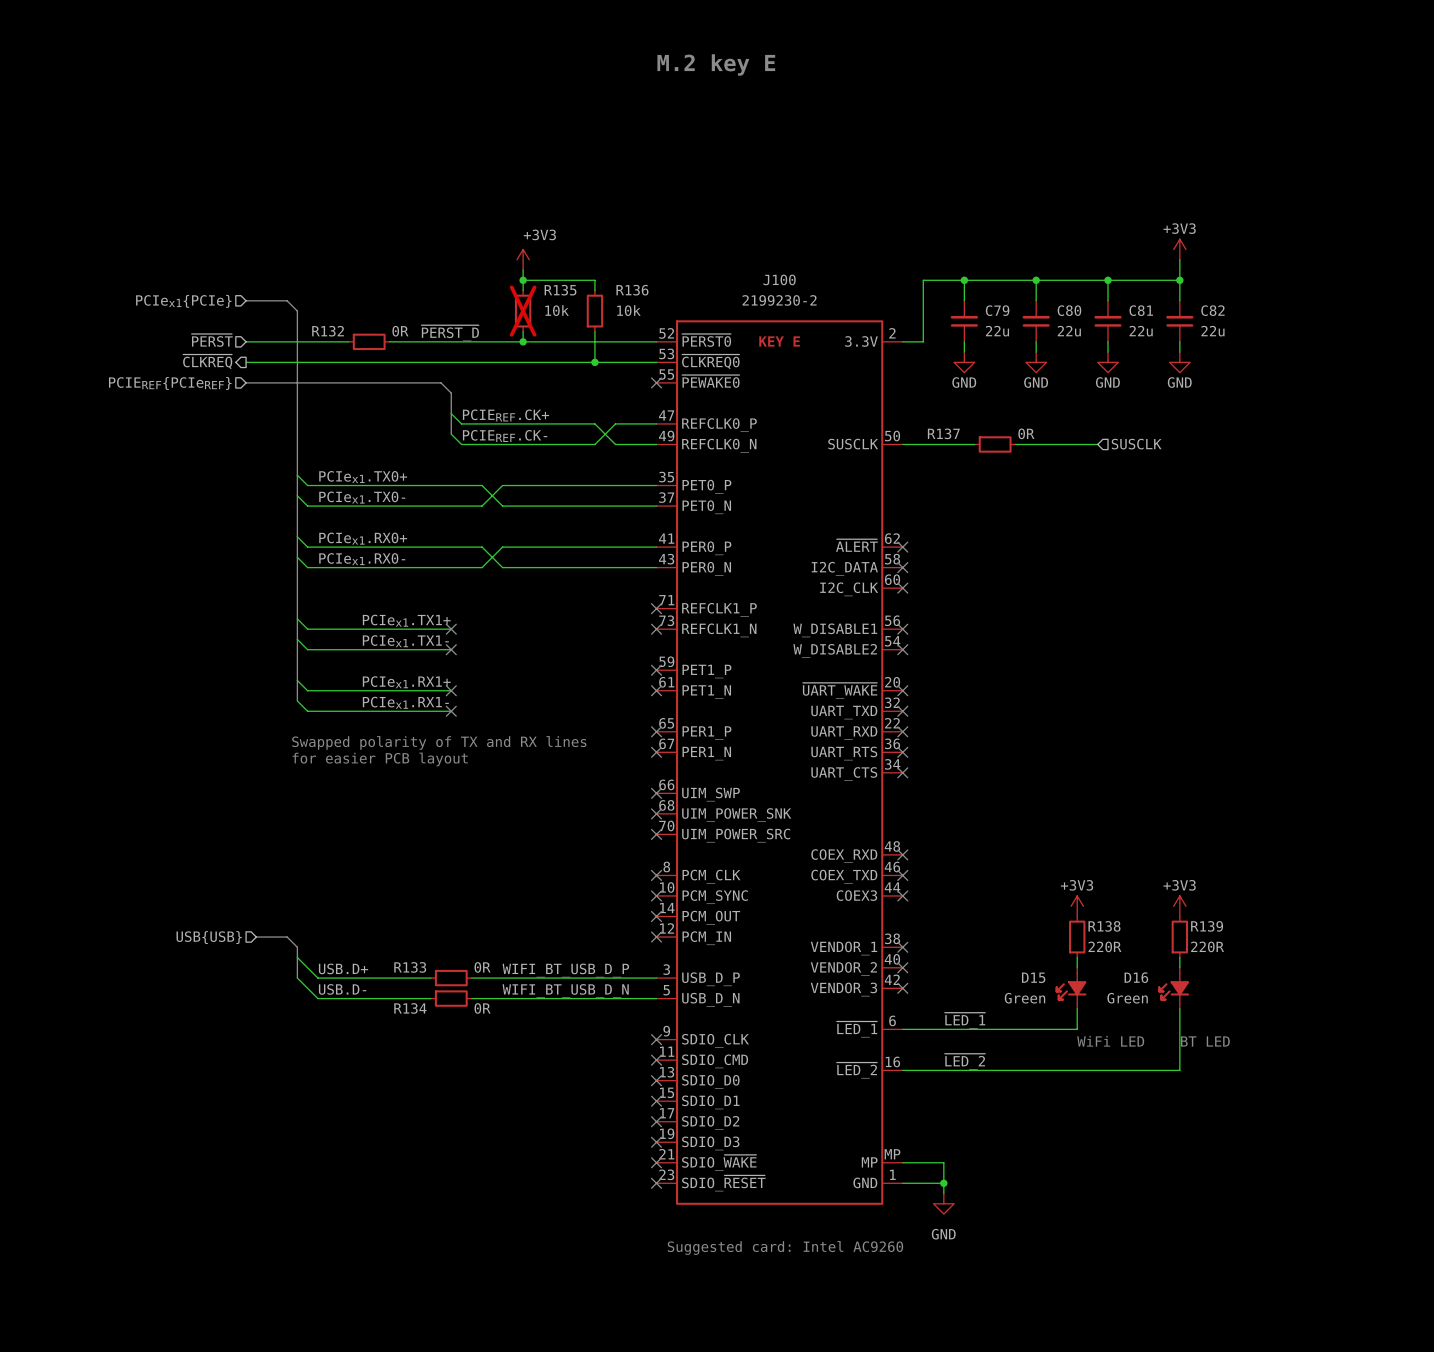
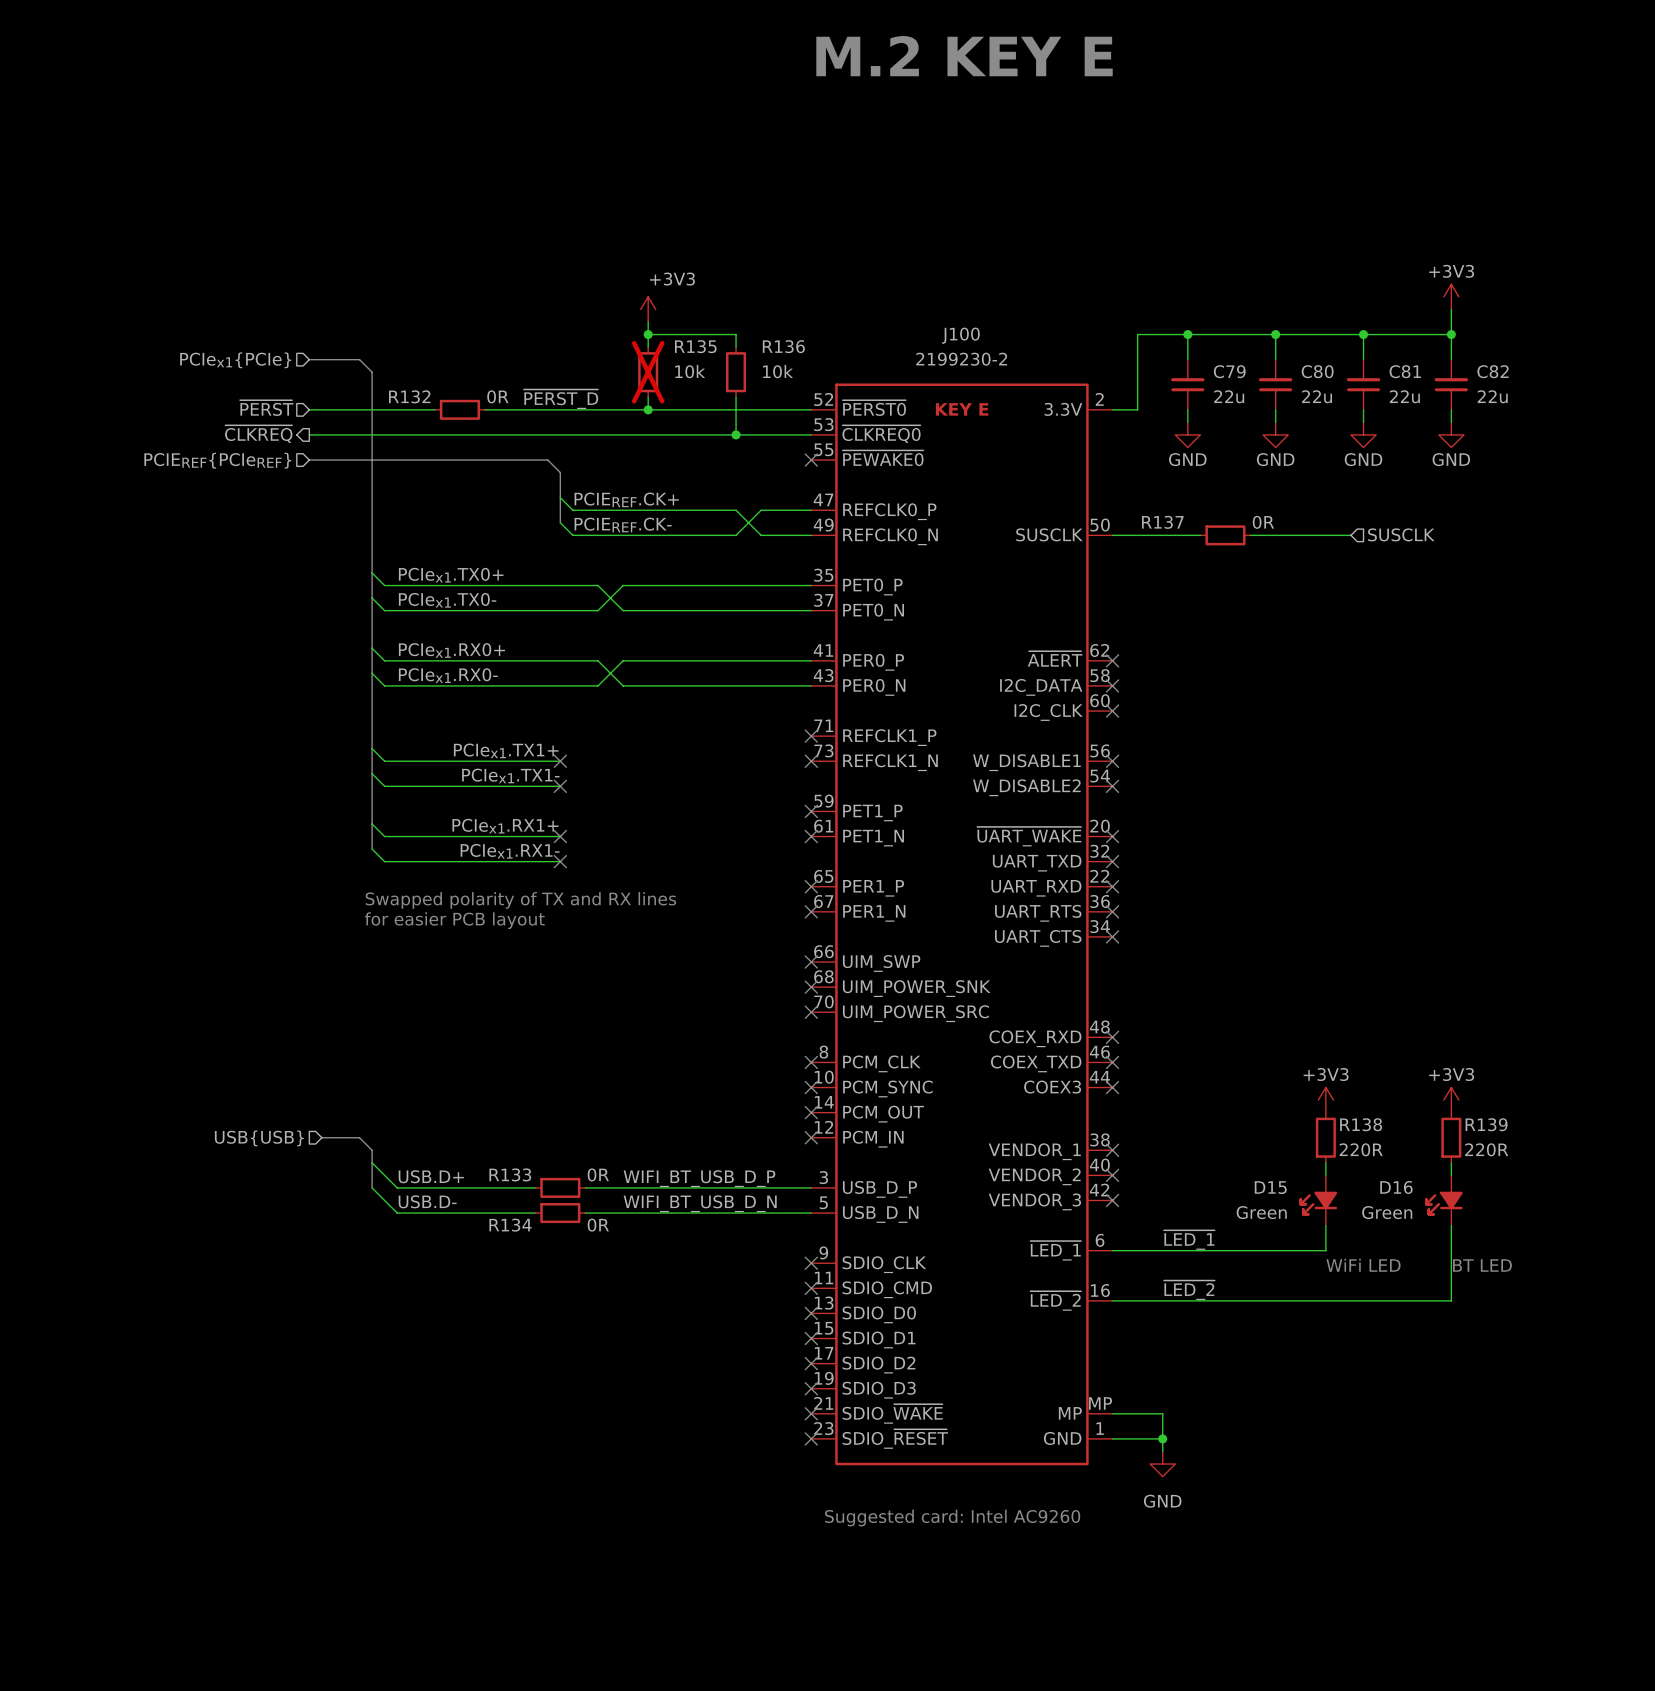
text: M.2 key E (716, 64) -> M.2 KEY E (964, 56)

